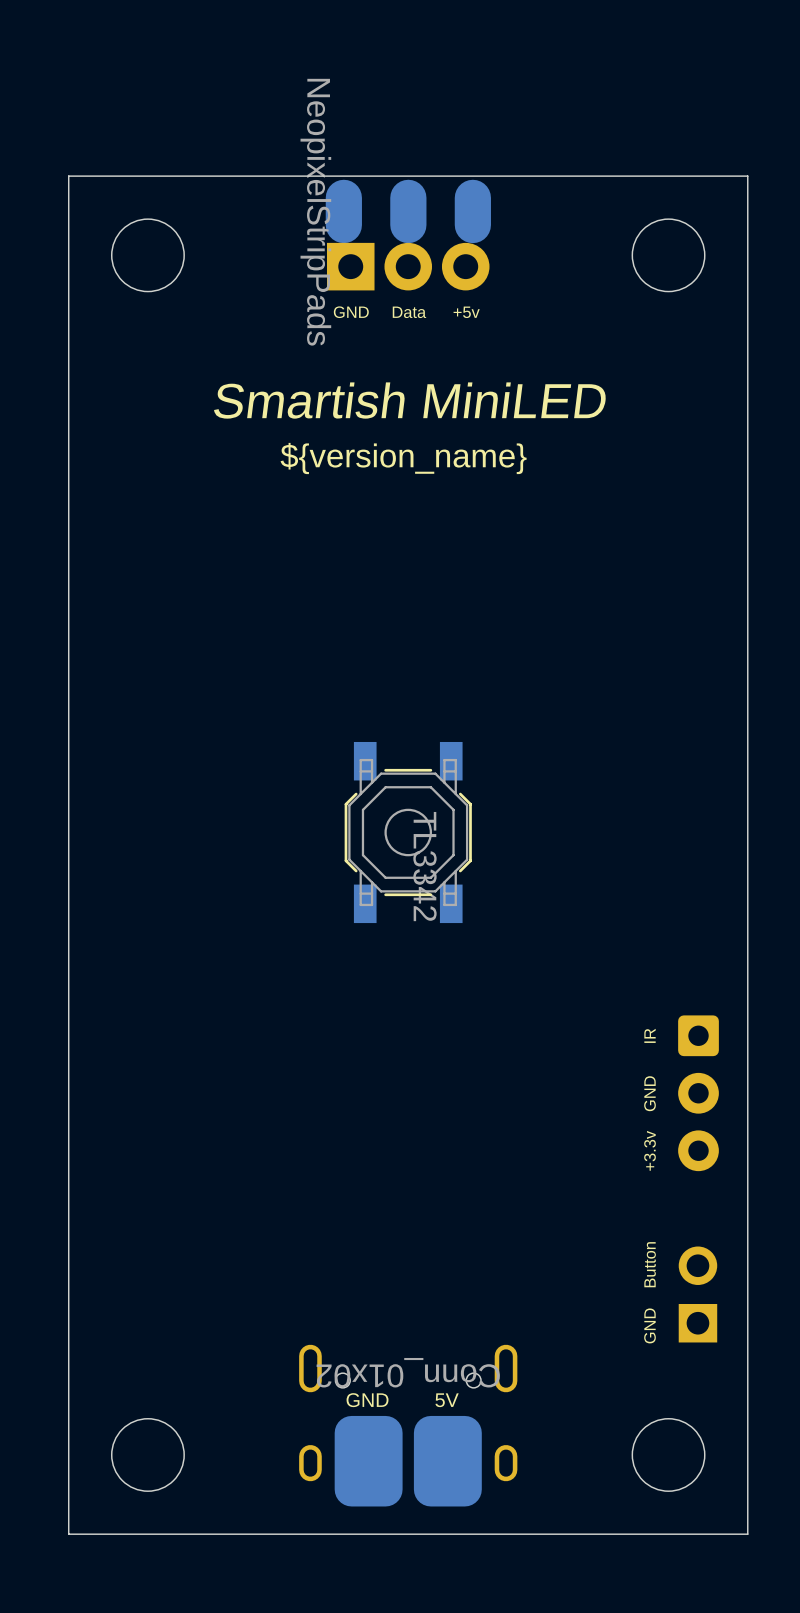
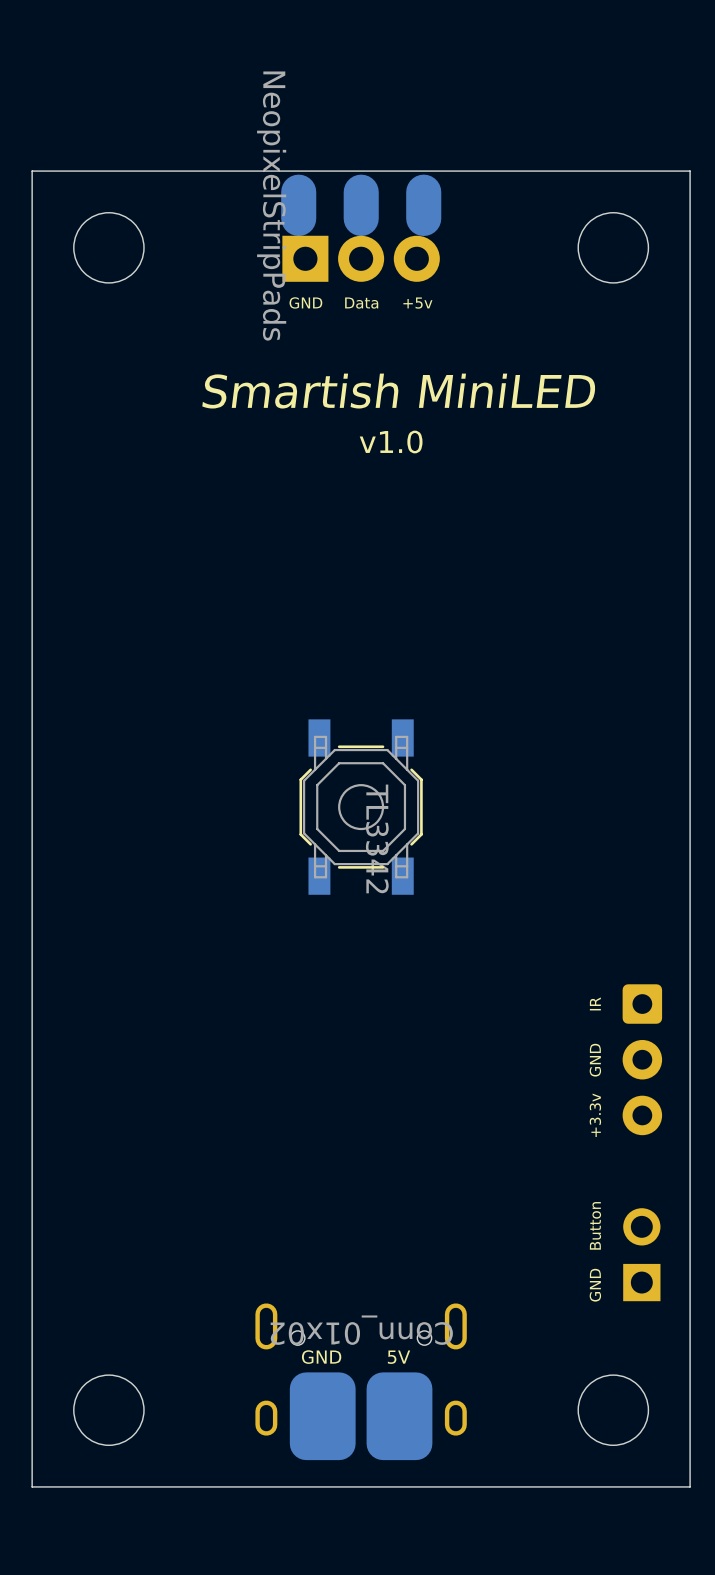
text position: Smartish MiniLED (410, 400) -> Smartish MiniLED (399, 391)
text: none -> v1.0 (391, 442)
text: ${version_name} (403, 458) -> none

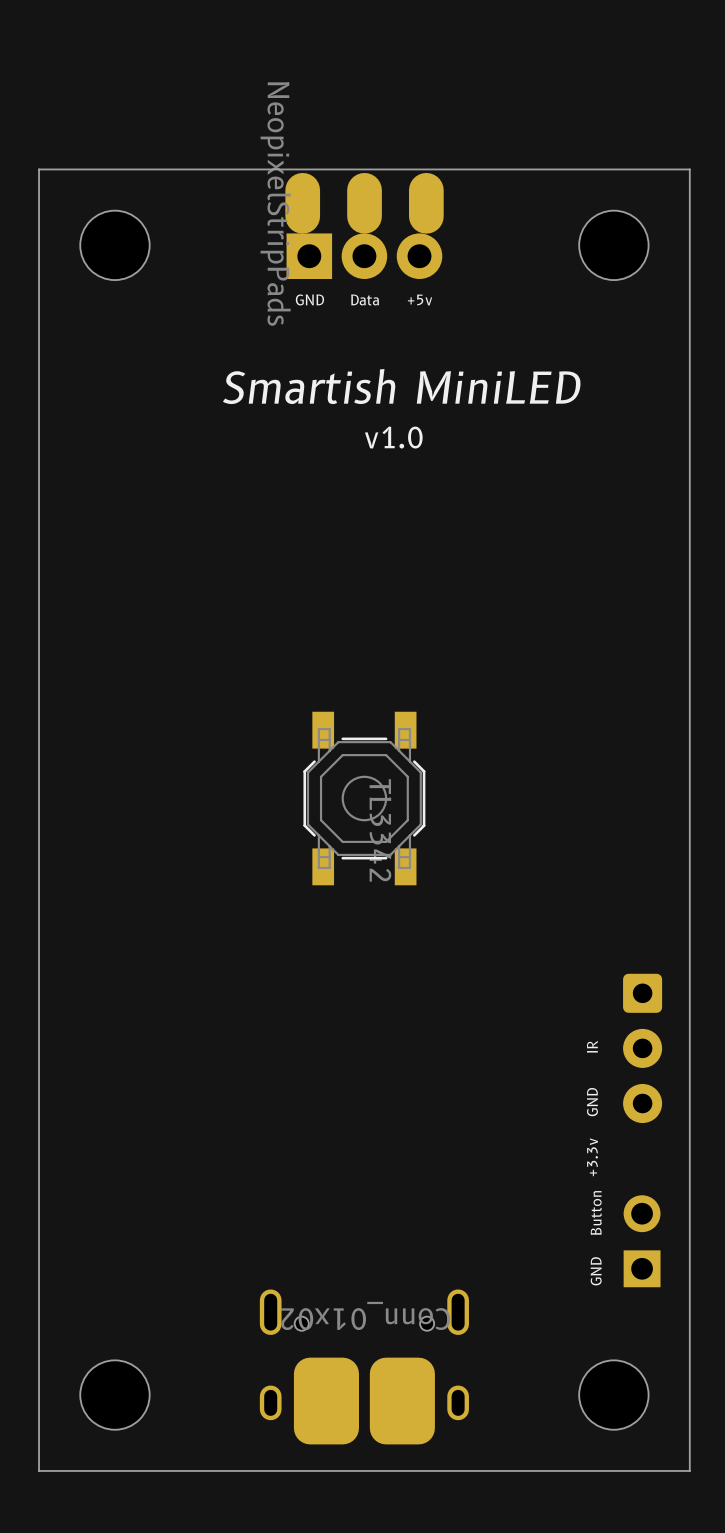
text: IR (595, 1003) -> none
text: GND (595, 1060) -> IR (592, 1046)
text: +3.3v (595, 1115) -> GND (592, 1102)
text: none -> +3.3v (592, 1157)
text: GND (321, 1357) -> none
text: 5V (399, 1357) -> none

